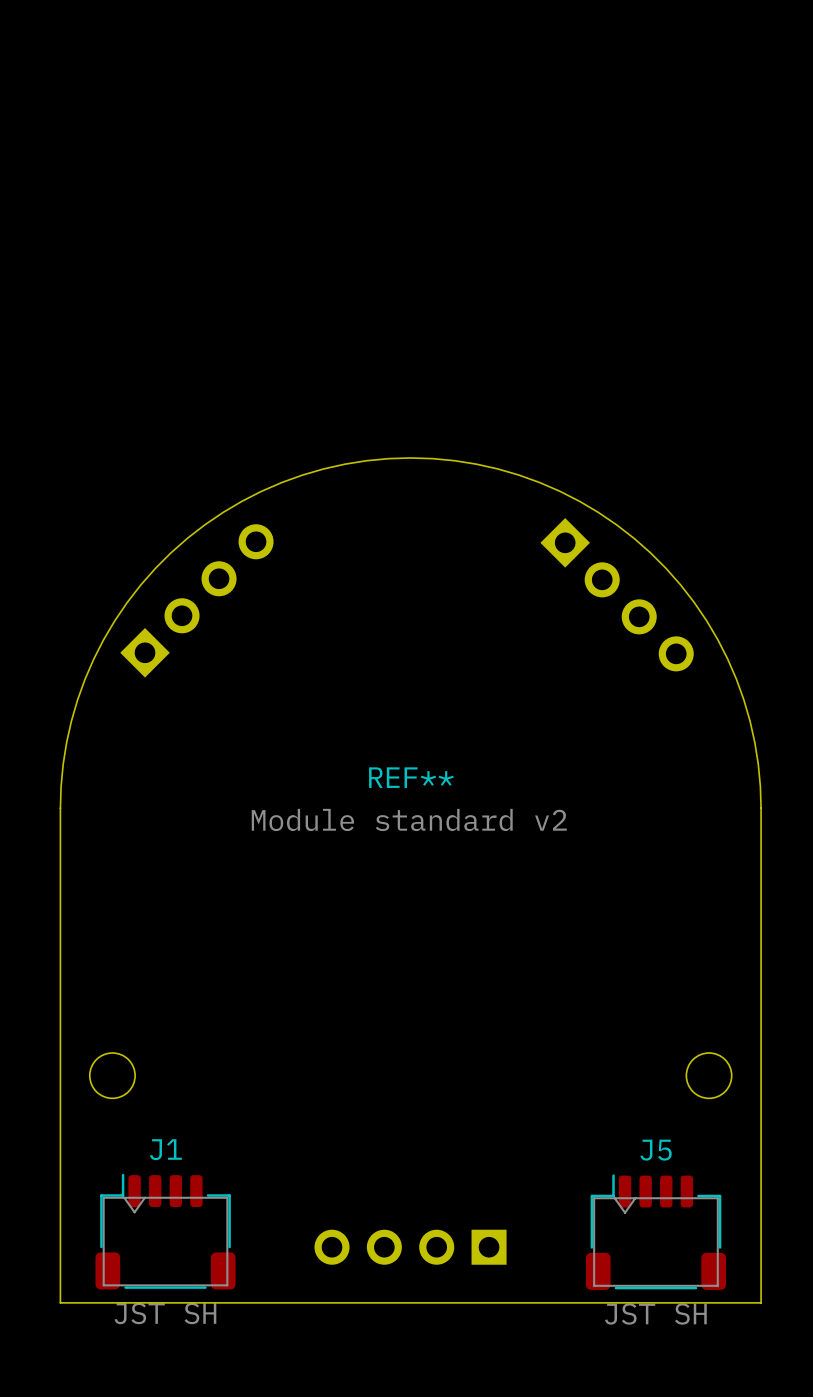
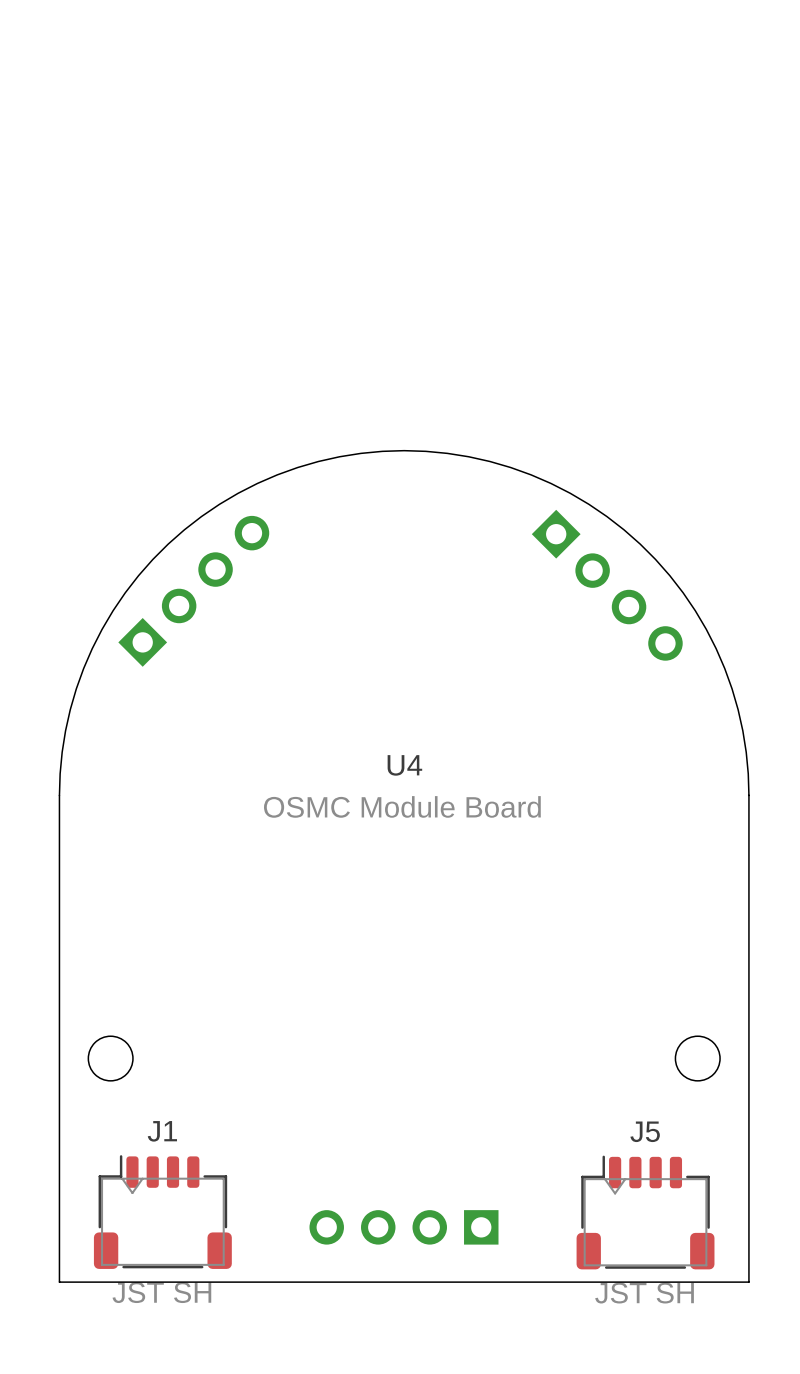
REF** name: REF** (411, 777) -> U4 (404, 765)
REF** value: Module standard v2 (409, 819) -> OSMC Module Board (402, 806)

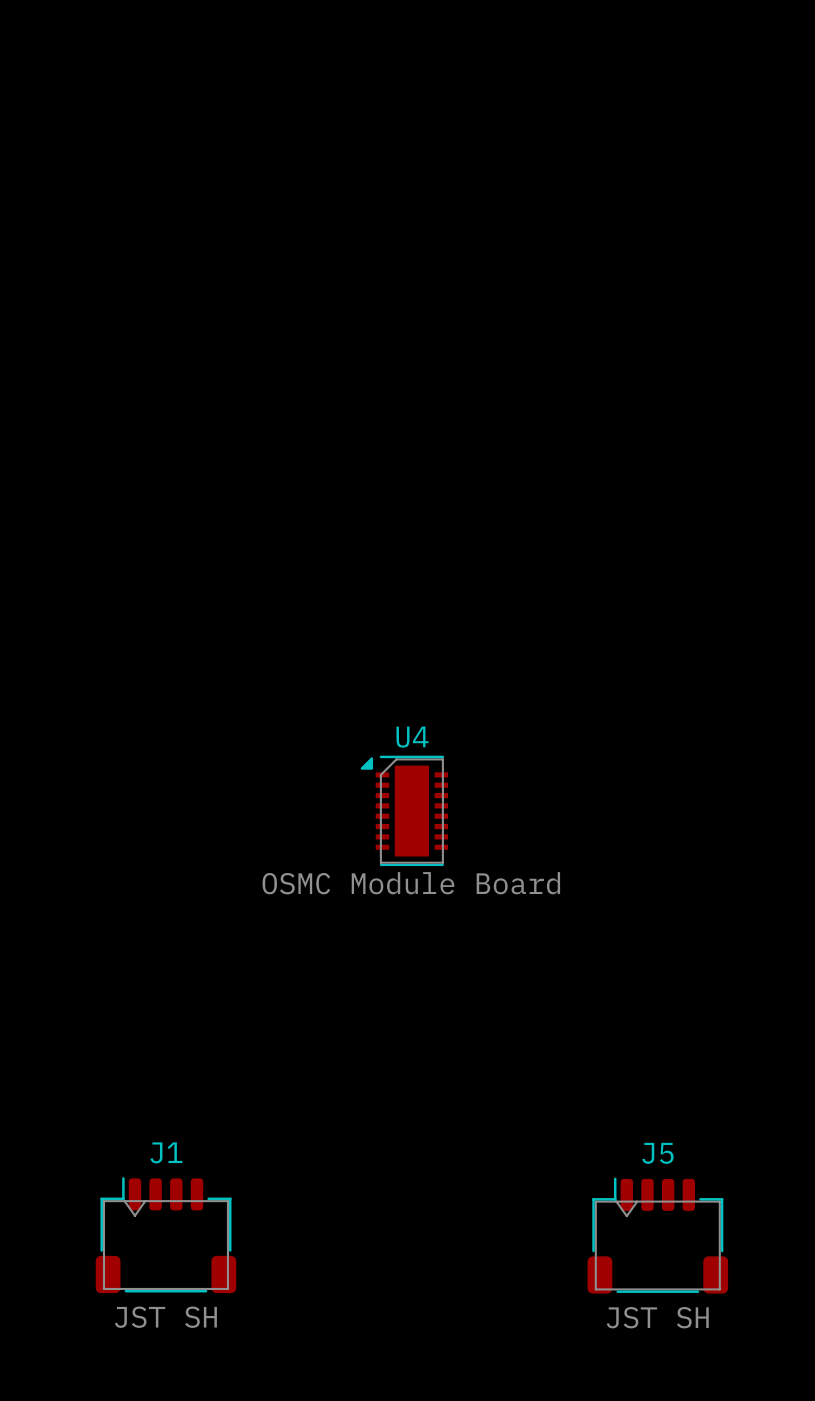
U4 footprint: [58, 450, 750, 1283] -> [360, 755, 449, 867]
part: (607, 585) -> none
part: (193, 591) -> none
U4 value position: OSMC Module Board (402, 806) -> OSMC Module Board (411, 883)
part: (403, 1227) -> none

